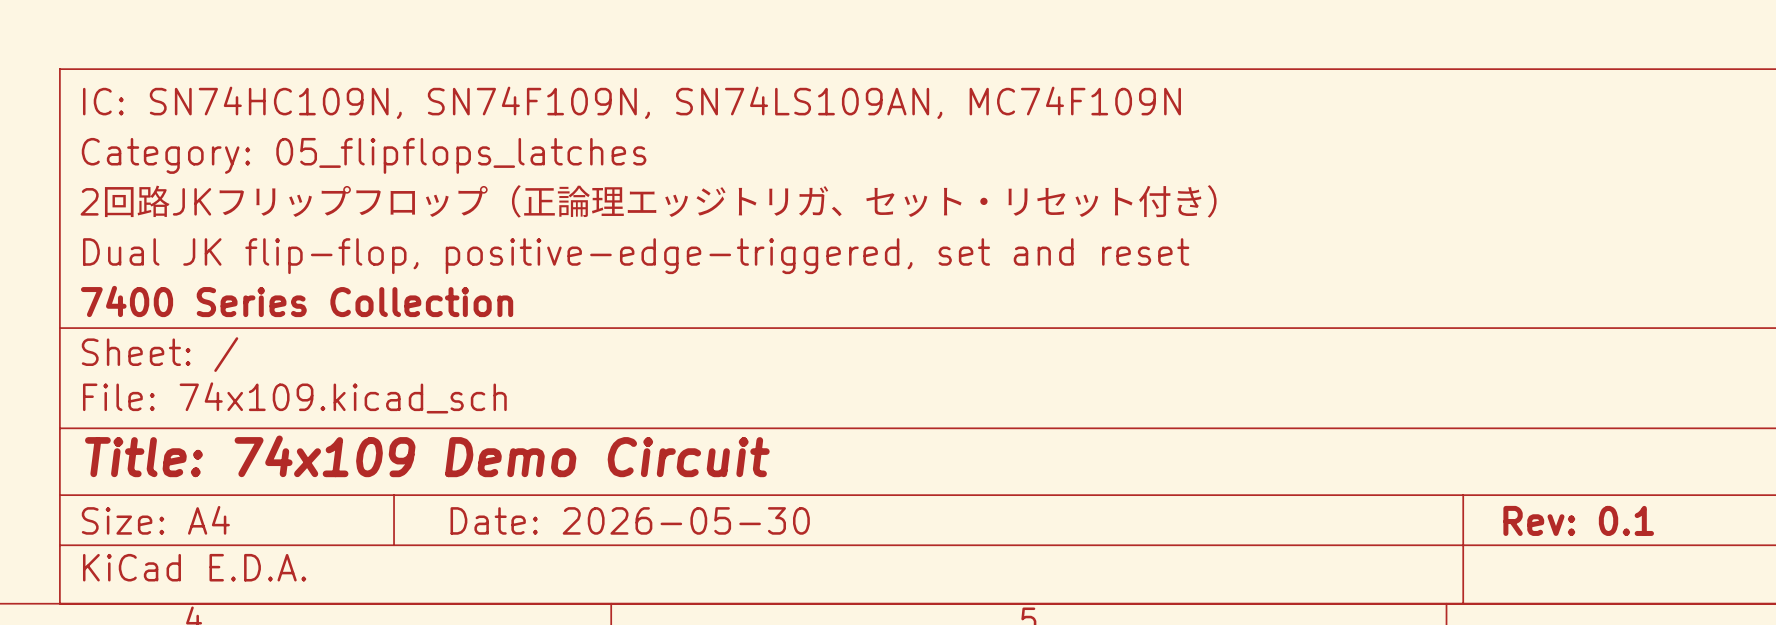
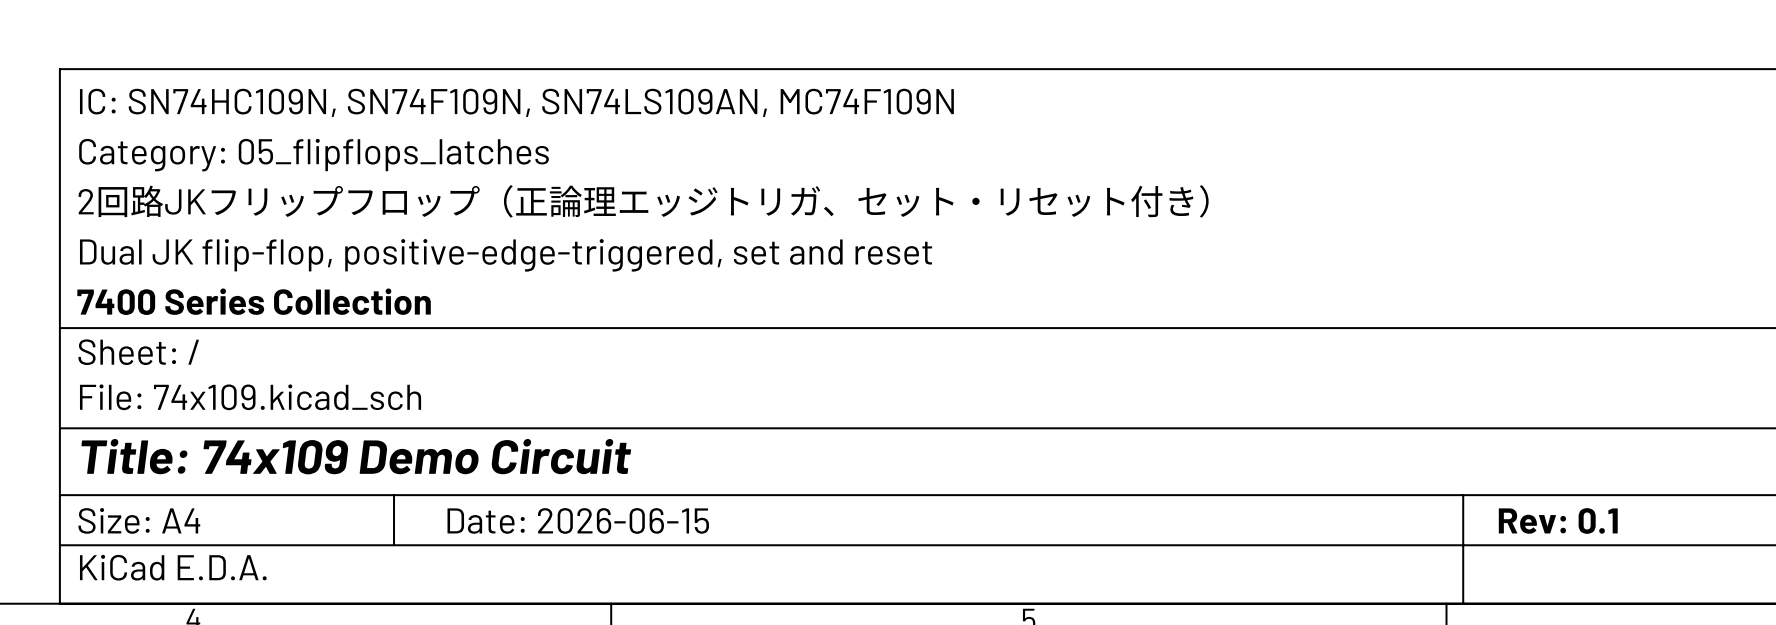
title block: Date: 2026-05-30 (630, 520) -> Date: 2026-06-15 (578, 520)

